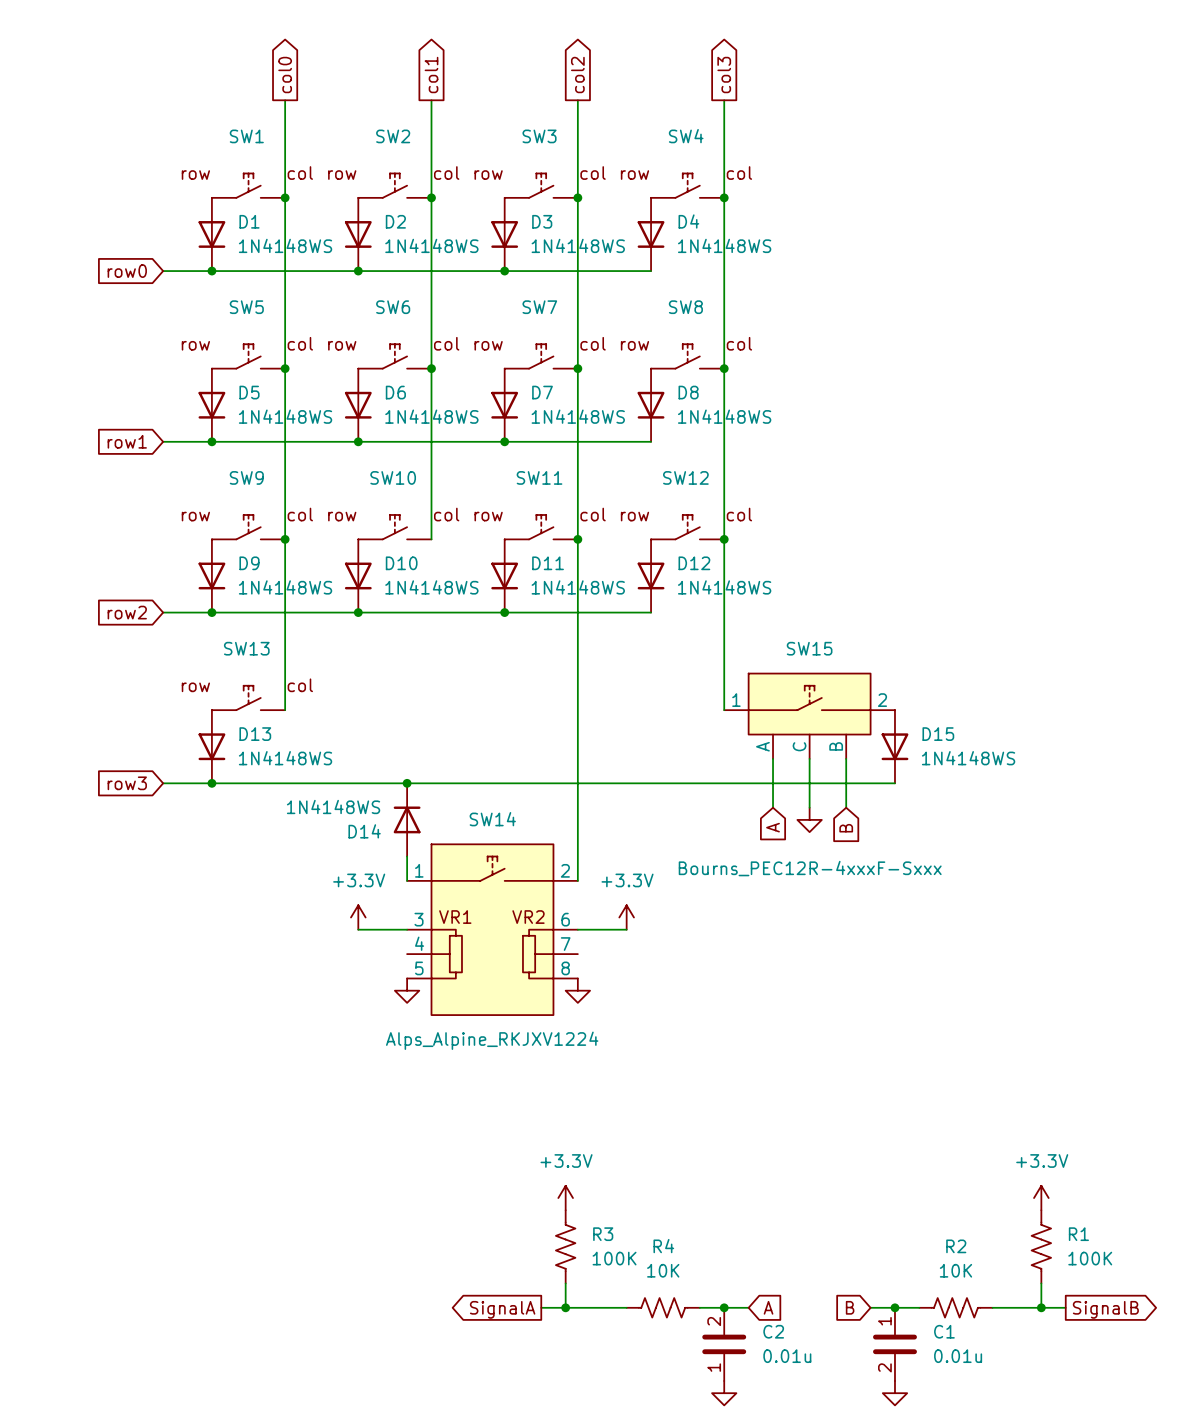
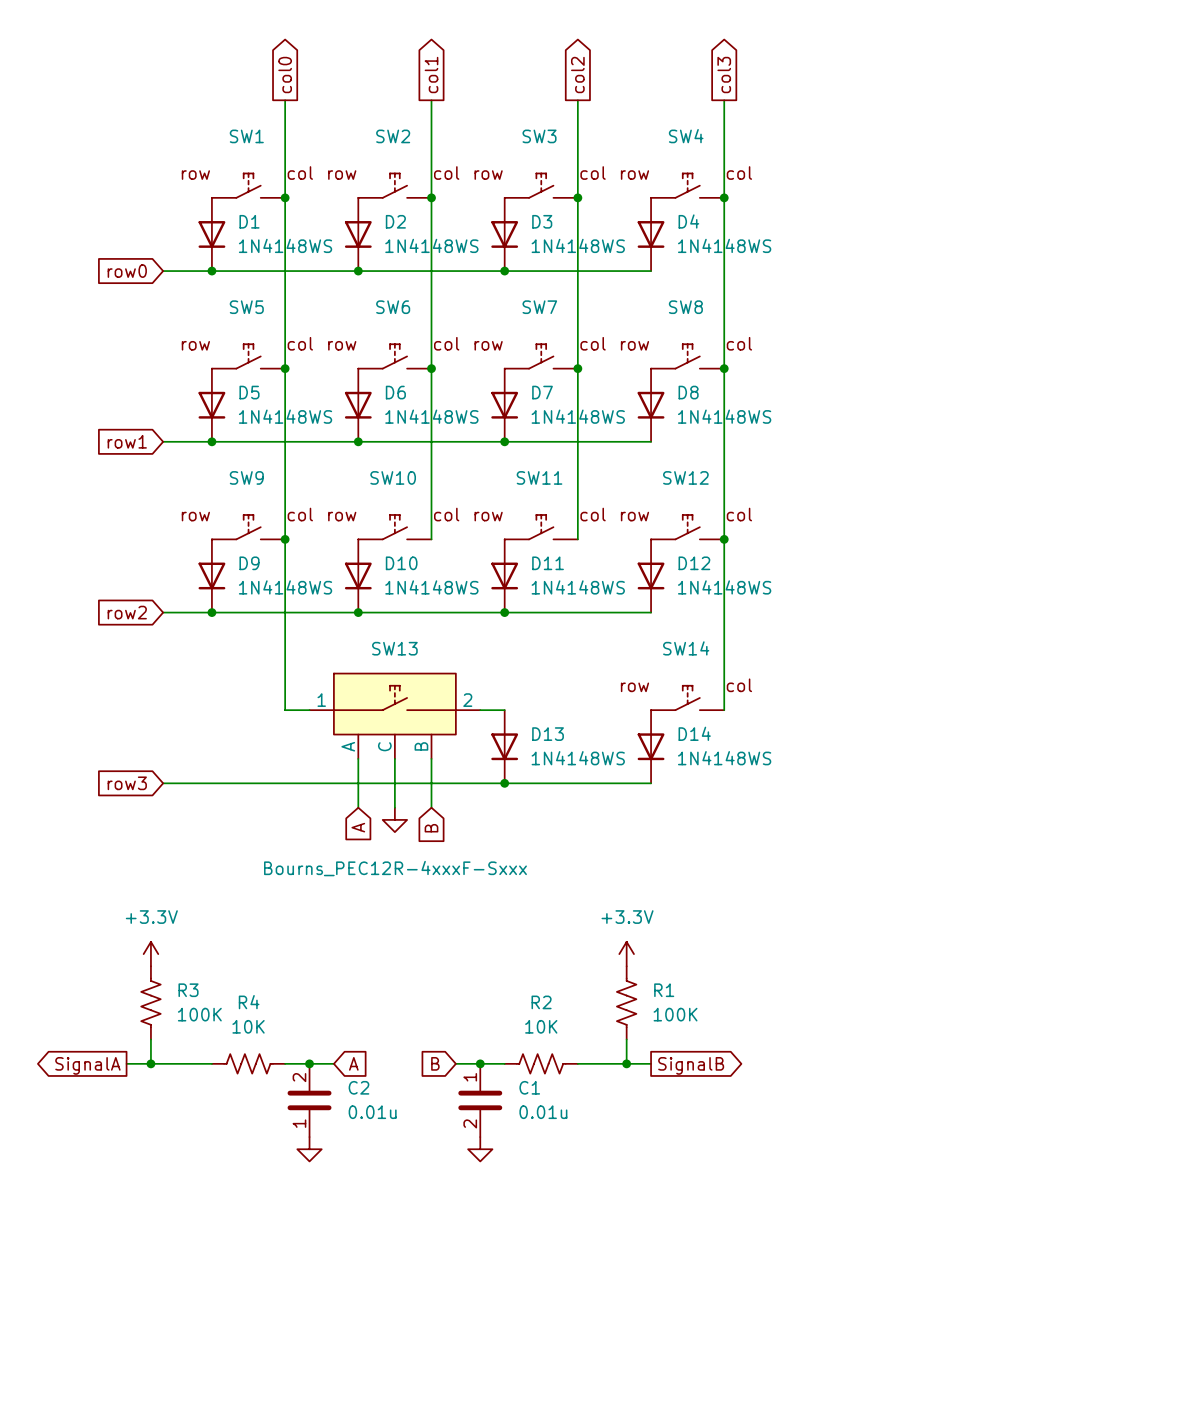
wire: (577, 539) (577, 880) -> none
junction: (577, 539) -> none
SW13 symbol: [211, 685, 286, 711] -> [309, 673, 481, 759]
wire: none -> (285, 710) (309, 710)
wire: none -> (480, 710) (504, 710)
SW15: Bourns_PEC12R-4xxxF-Sxxx (809, 716) -> none
D13 position: (211, 746) -> (504, 746)
D15: 1N4148WS (894, 746) -> none
wire: none -> (358, 758) (358, 807)
wire: none -> (394, 758) (394, 807)
wire: none -> (431, 758) (431, 807)
wire: (773, 758) (773, 807) -> none
wire: (809, 758) (809, 807) -> none
wire: (846, 758) (846, 807) -> none
junction: (211, 783) -> none
junction: (407, 783) -> none
junction: none -> (504, 783)
wire: (651, 783) (894, 783) -> none
power symbol: none -> (394, 819)
D14 rotation: 0° (407, 819) -> 180° (651, 746)
D14 position: (407, 819) -> (651, 746)
SW14 name position: SW14 (492, 819) -> SW14 (686, 648)
power symbol: (809, 819) -> none
global label: none -> A (358, 827)
global label: A (773, 827) -> none
global label: none -> B (431, 828)
global label: B (846, 828) -> none
SW14 symbol: [407, 844, 578, 1016] -> [651, 685, 725, 711]
wire: (407, 856) (407, 880) -> none
SW13 value: none -> Bourns_PEC12R-4xxxF-Sxxx (395, 868)
power symbol: +3.3V (358, 917) -> none
power symbol position: +3.3V (626, 917) -> +3.3V (626, 954)
wire: (358, 929) (407, 929) -> (285, 1063) (333, 1063)
wire: (577, 929) (626, 929) -> (455, 1063) (504, 1063)
power symbol: none -> +3.3V (150, 954)
power symbol: (407, 990) -> none
power symbol: (577, 990) -> none
wire: none -> (150, 1039) (150, 1063)
wire: none -> (626, 1039) (626, 1063)
SW14 value: Alps_Alpine_RKJXV1224 (492, 1040) -> none
wire: none -> (126, 1063) (211, 1063)
junction: none -> (150, 1063)
junction: none -> (309, 1063)
global label: none -> A (353, 1063)
global label: none -> B (435, 1063)
junction: none -> (480, 1063)
wire: none -> (577, 1063) (651, 1063)
junction: none -> (626, 1063)
global label: none -> SignalA (87, 1065)
global label: none -> SignalB (691, 1065)
power symbol: none -> (309, 1149)
power symbol: none -> (480, 1149)
power symbol: +3.3V (565, 1198) -> none
power symbol: +3.3V (1041, 1198) -> none
R3 position: (565, 1246) -> (150, 1002)
R1 position: (1041, 1246) -> (626, 1002)
wire: (565, 1283) (565, 1307) -> none
wire: (1041, 1283) (1041, 1307) -> none
wire: (541, 1307) (626, 1307) -> none
junction: (565, 1307) -> none
R4 position: (663, 1307) -> (248, 1063)
wire: (699, 1307) (748, 1307) -> none
junction: (724, 1307) -> none
global label: A (768, 1307) -> none
global label: B (850, 1307) -> none
wire: (870, 1307) (919, 1307) -> none
junction: (894, 1307) -> none
R2 position: (955, 1307) -> (541, 1063)
wire: (992, 1307) (1065, 1307) -> none
junction: (1041, 1307) -> none
global label: SignalA (502, 1309) -> none
global label: SignalB (1105, 1309) -> none
C2 position: (724, 1344) -> (309, 1100)
C1 position: (894, 1344) -> (480, 1100)
power symbol: (724, 1393) -> none
power symbol: (894, 1393) -> none

